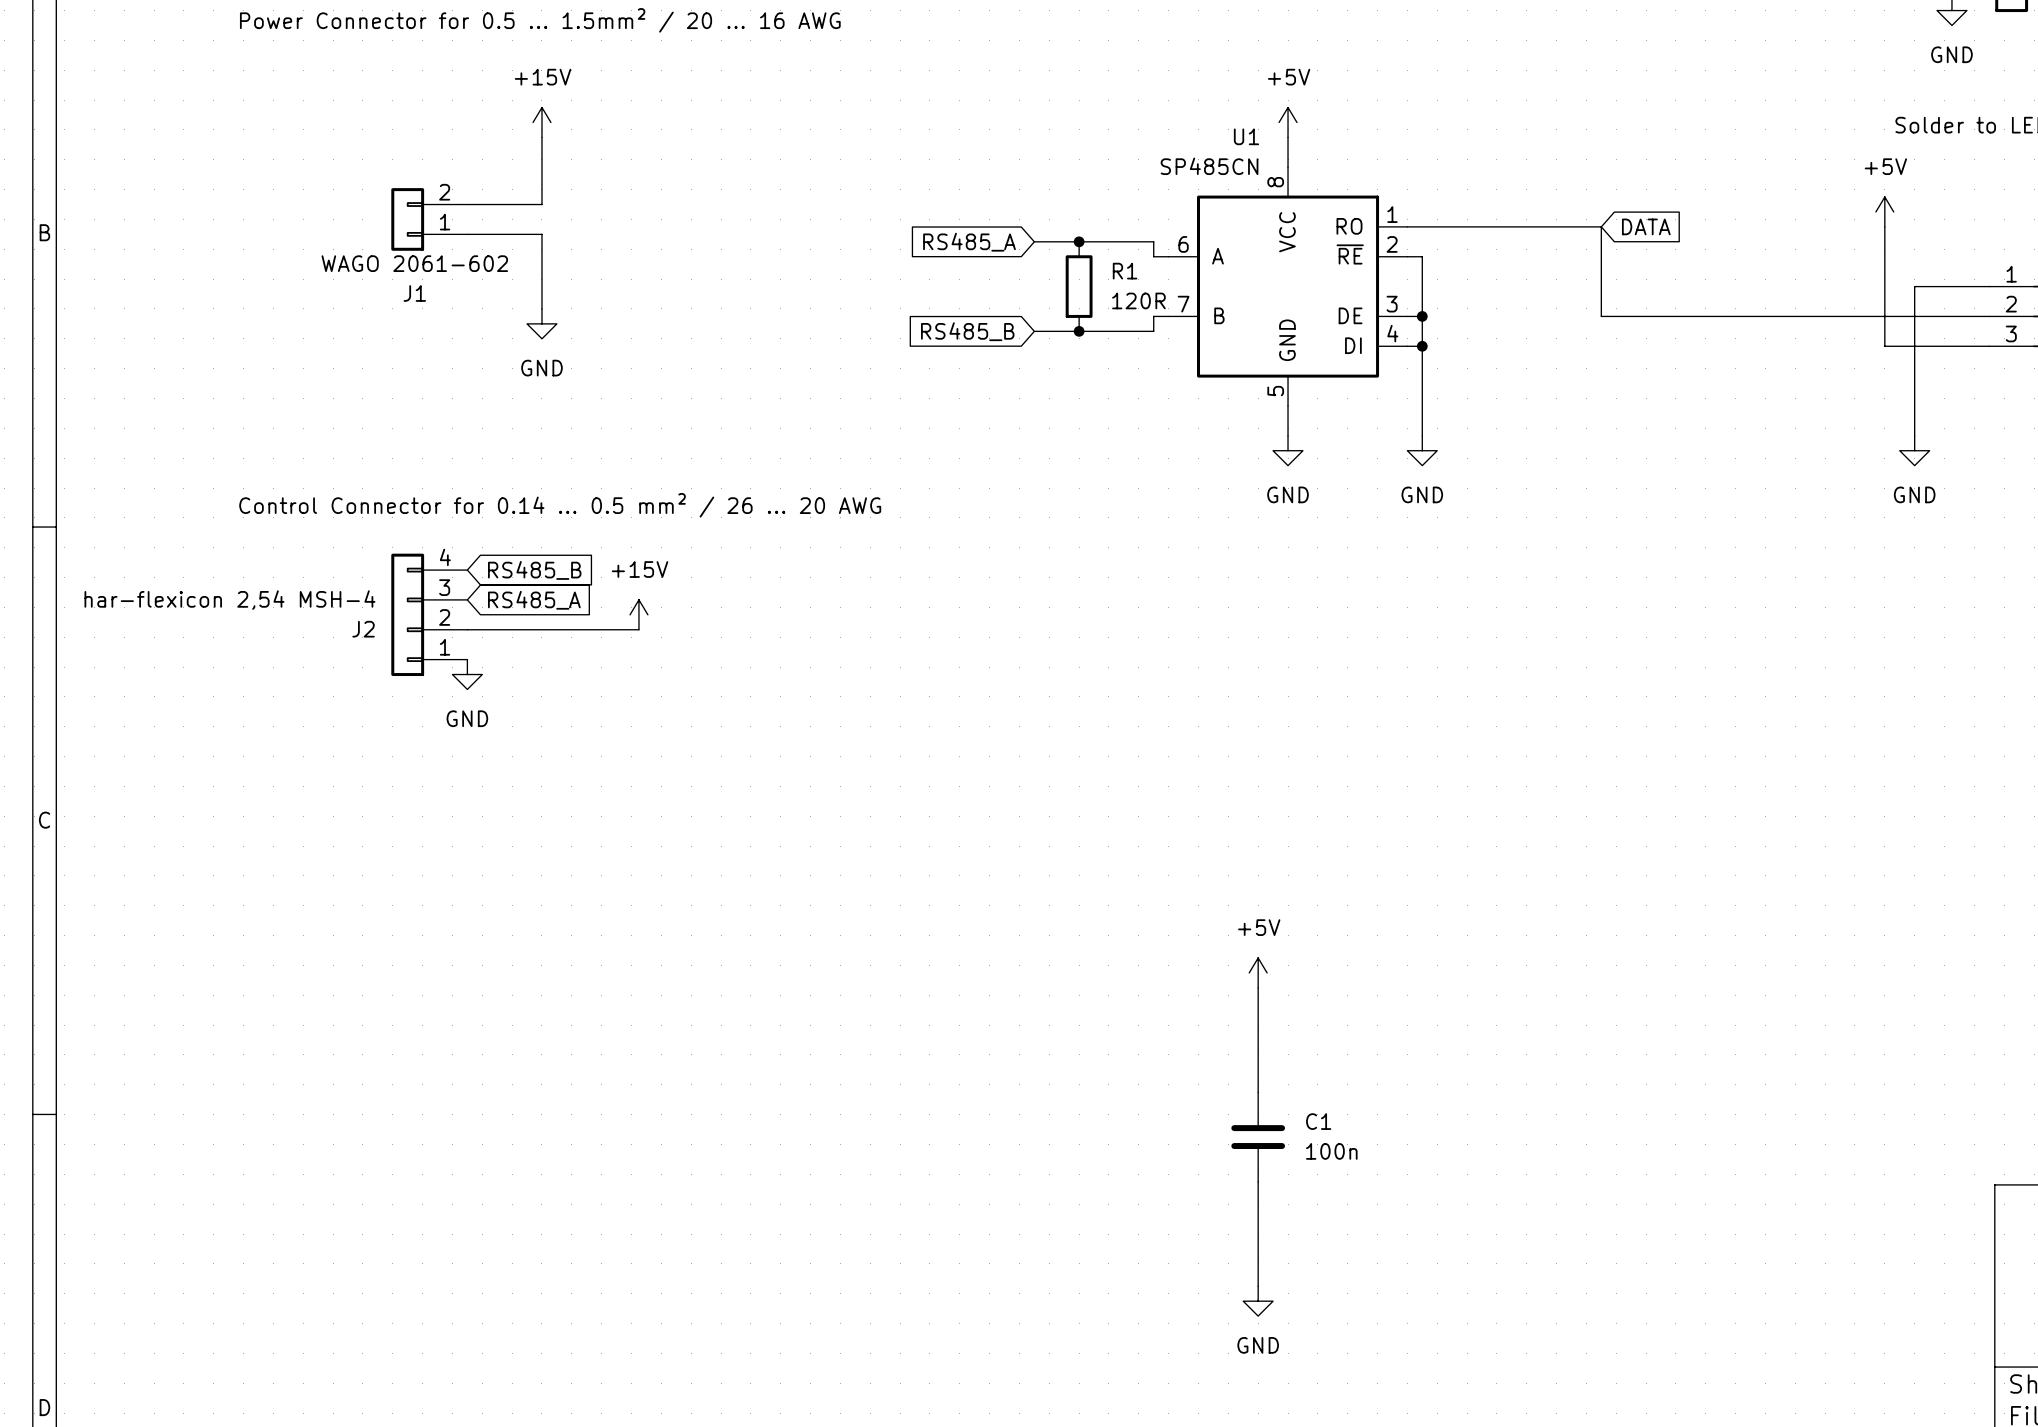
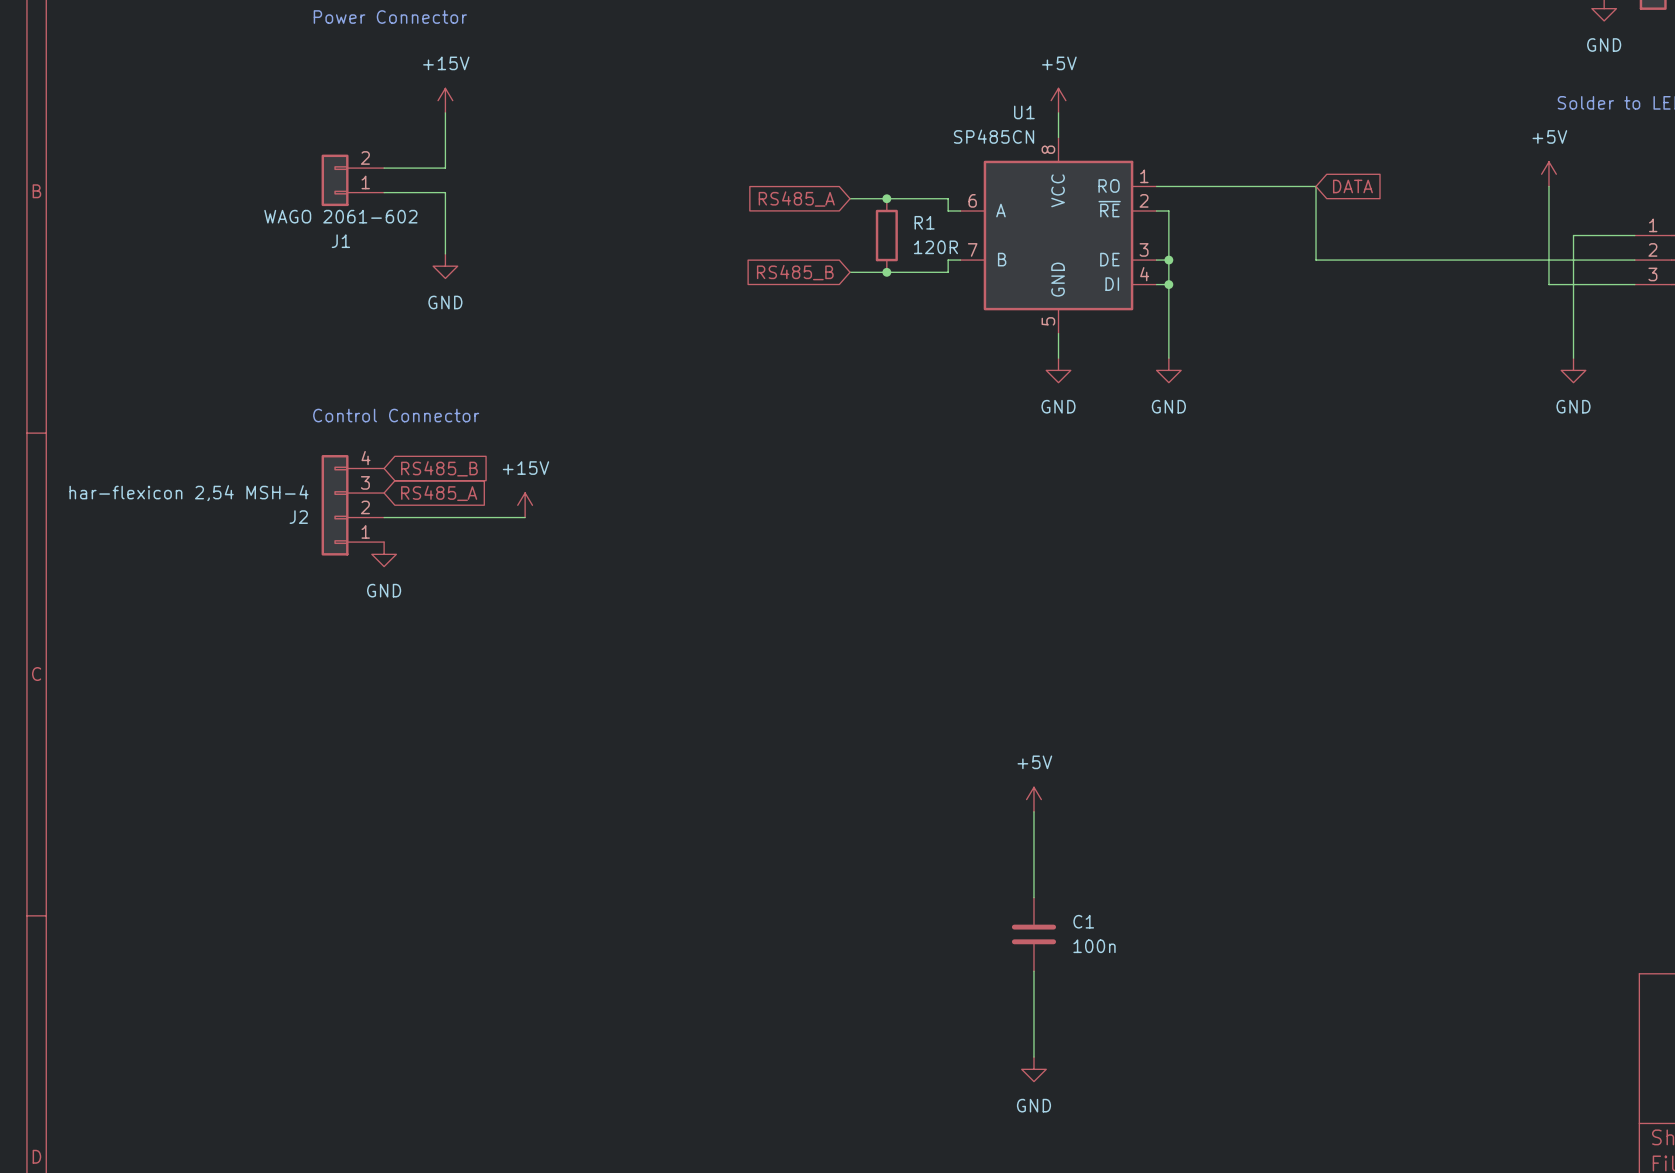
text: none -> Power Connector (390, 17)
text: Power Connector for 0.5 … 1.5mm² / 20 … 16 AWG (540, 20) -> none
text: none -> Control Connector (396, 415)
text: Control Connector for 0.14 … 0.5 mm² / 26 … 20 AWG (560, 505) -> none

